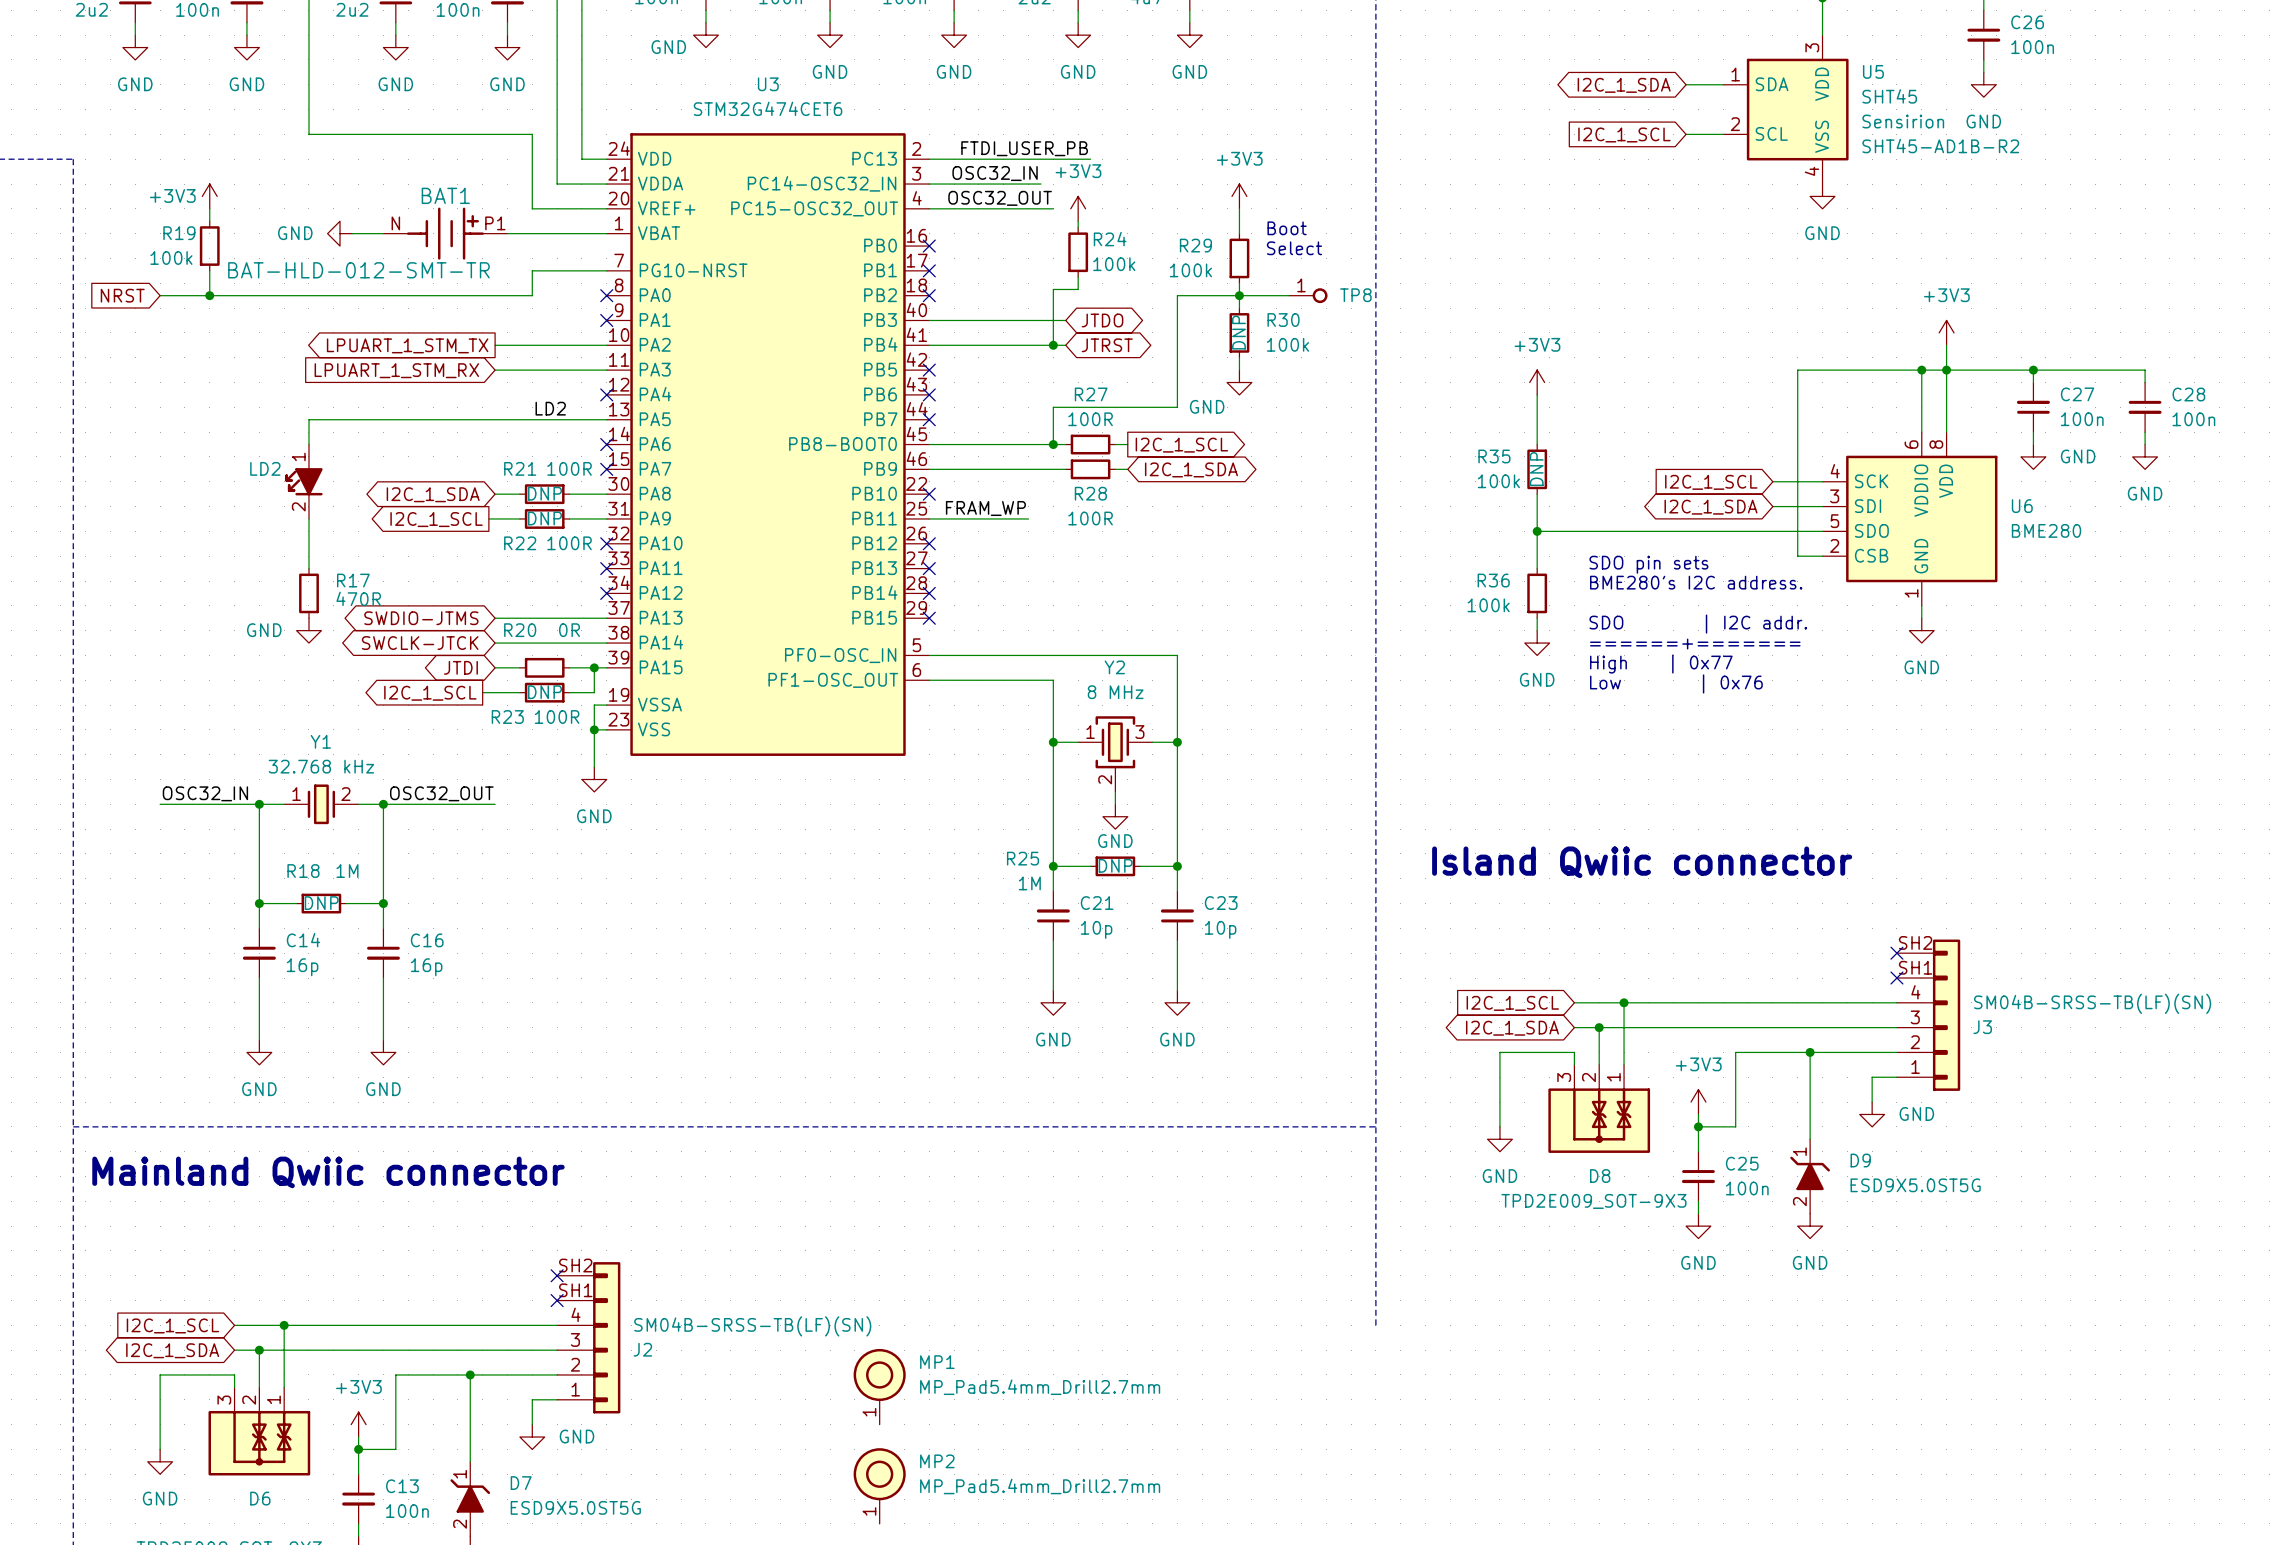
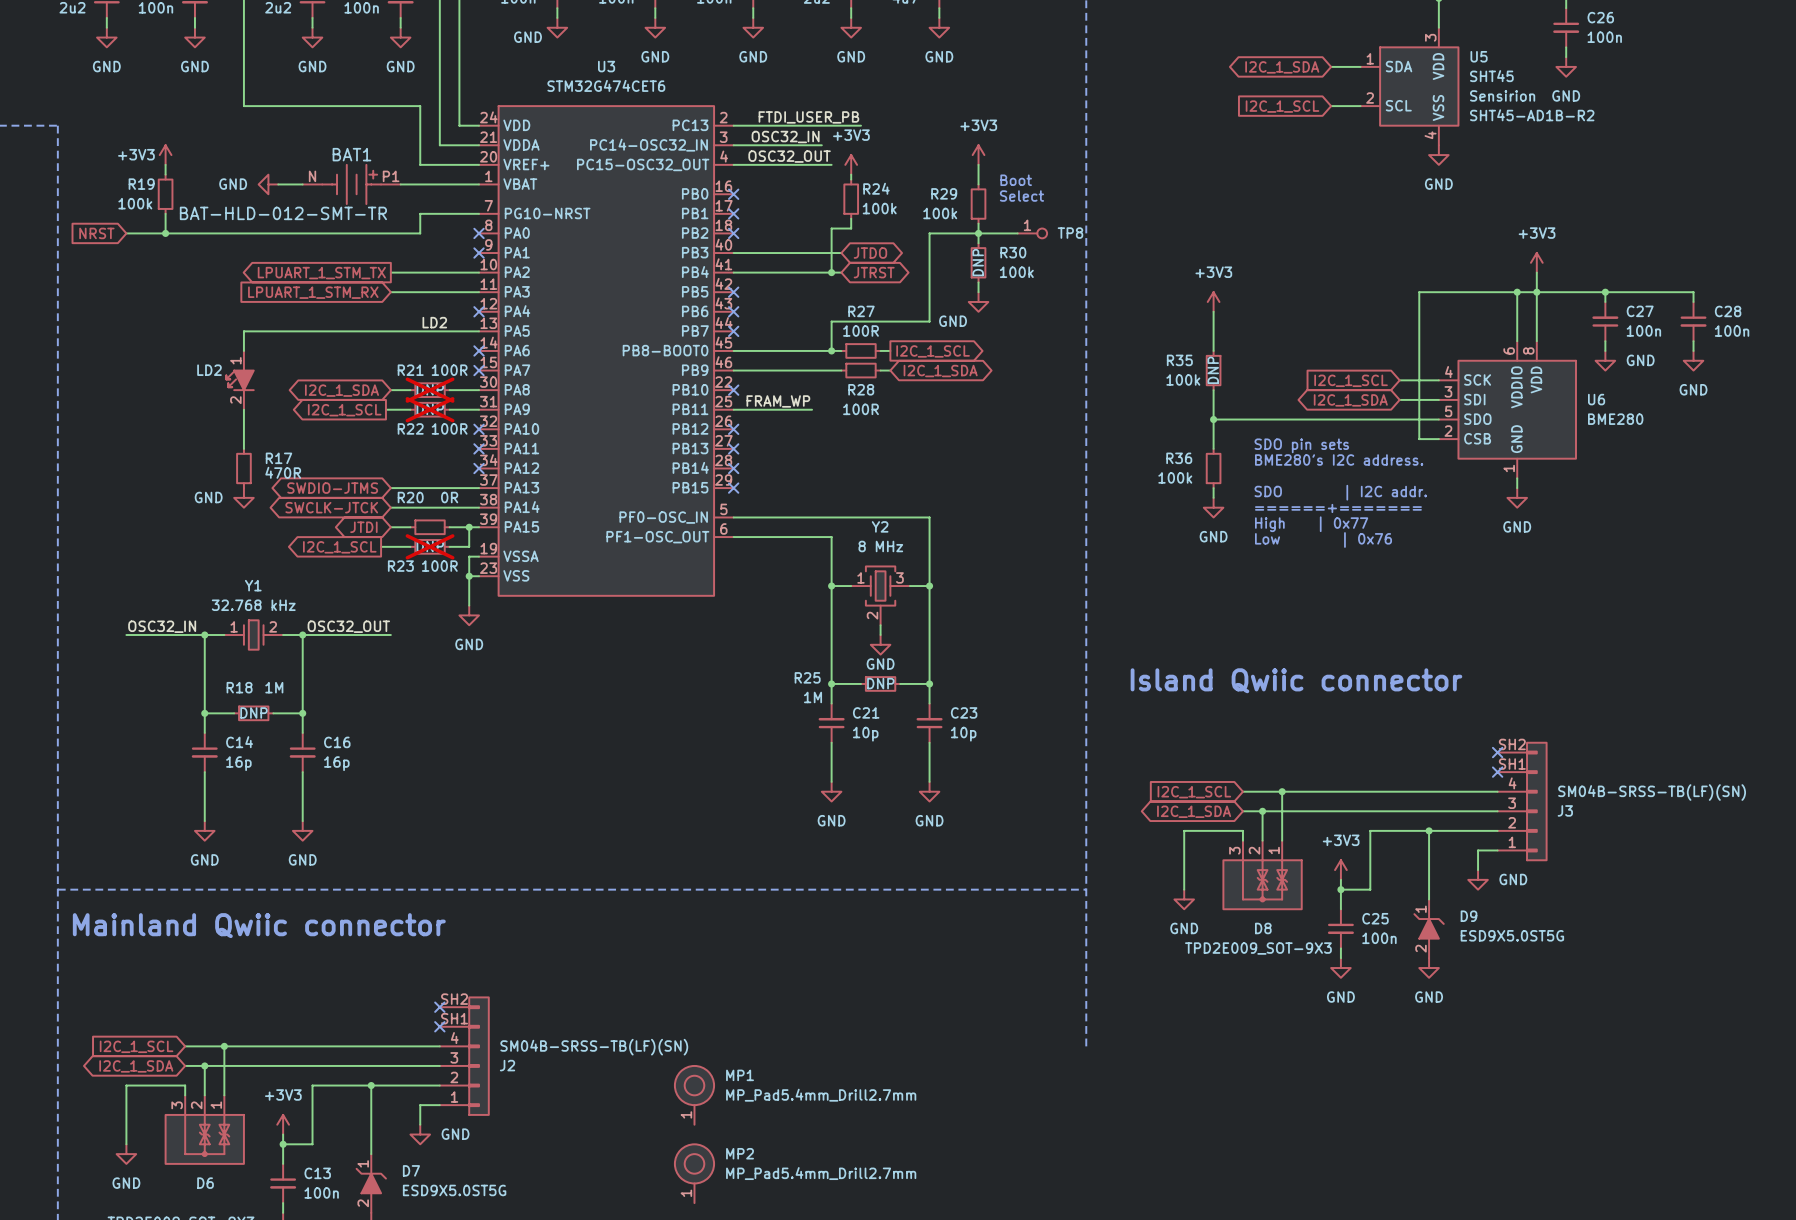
R21 do-not-place cross: none -> (430, 390)
R22 do-not-place cross: none -> (430, 409)
R23 do-not-place cross: none -> (430, 546)

